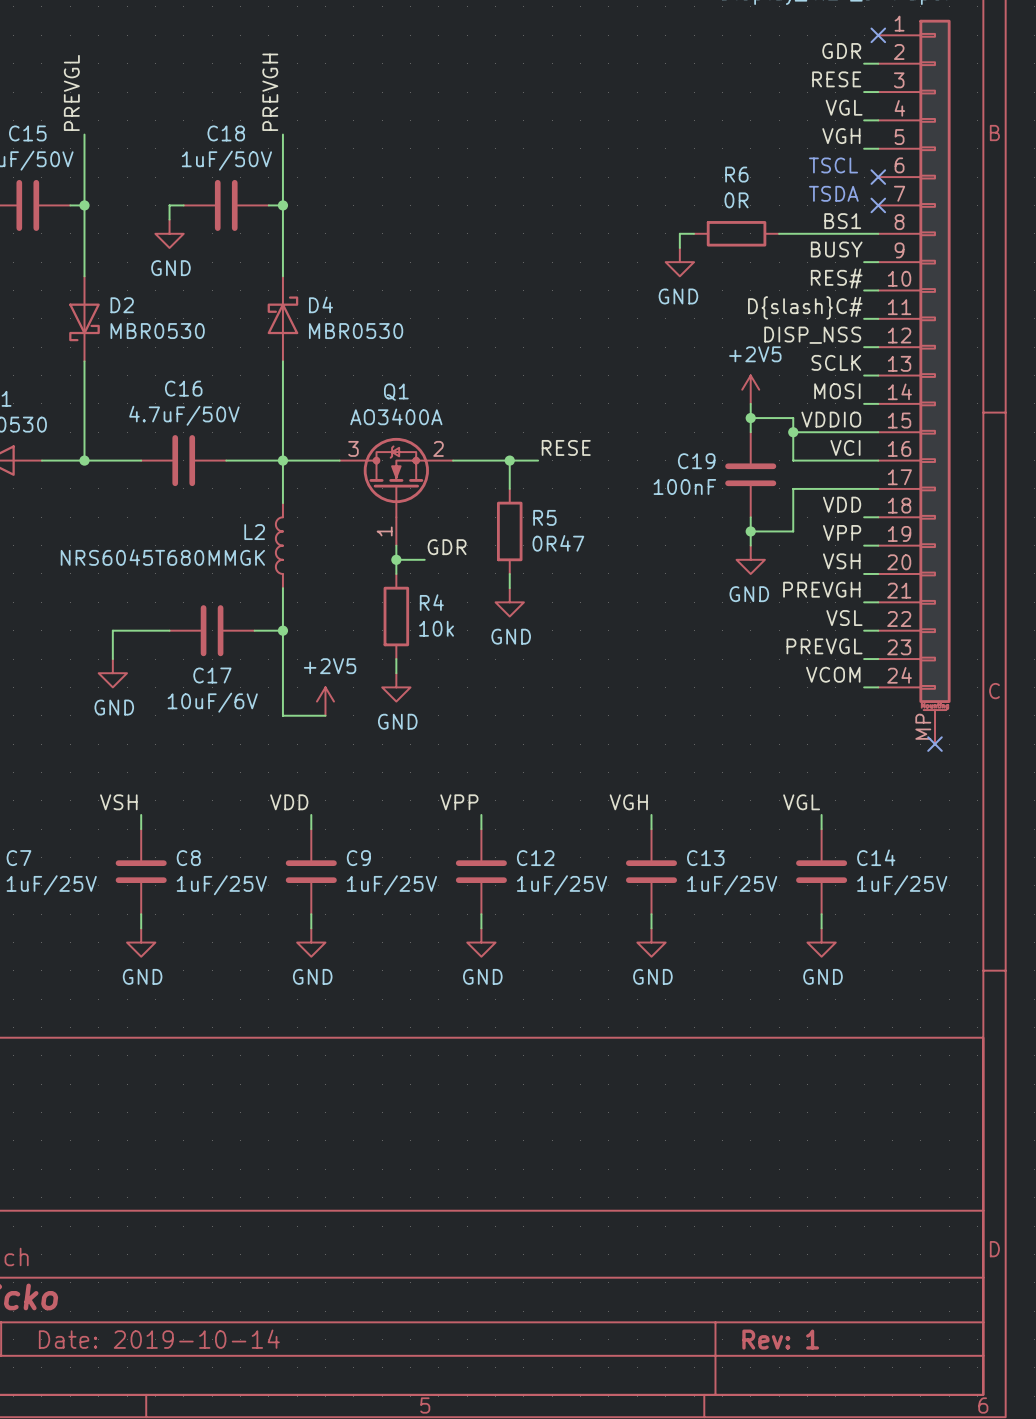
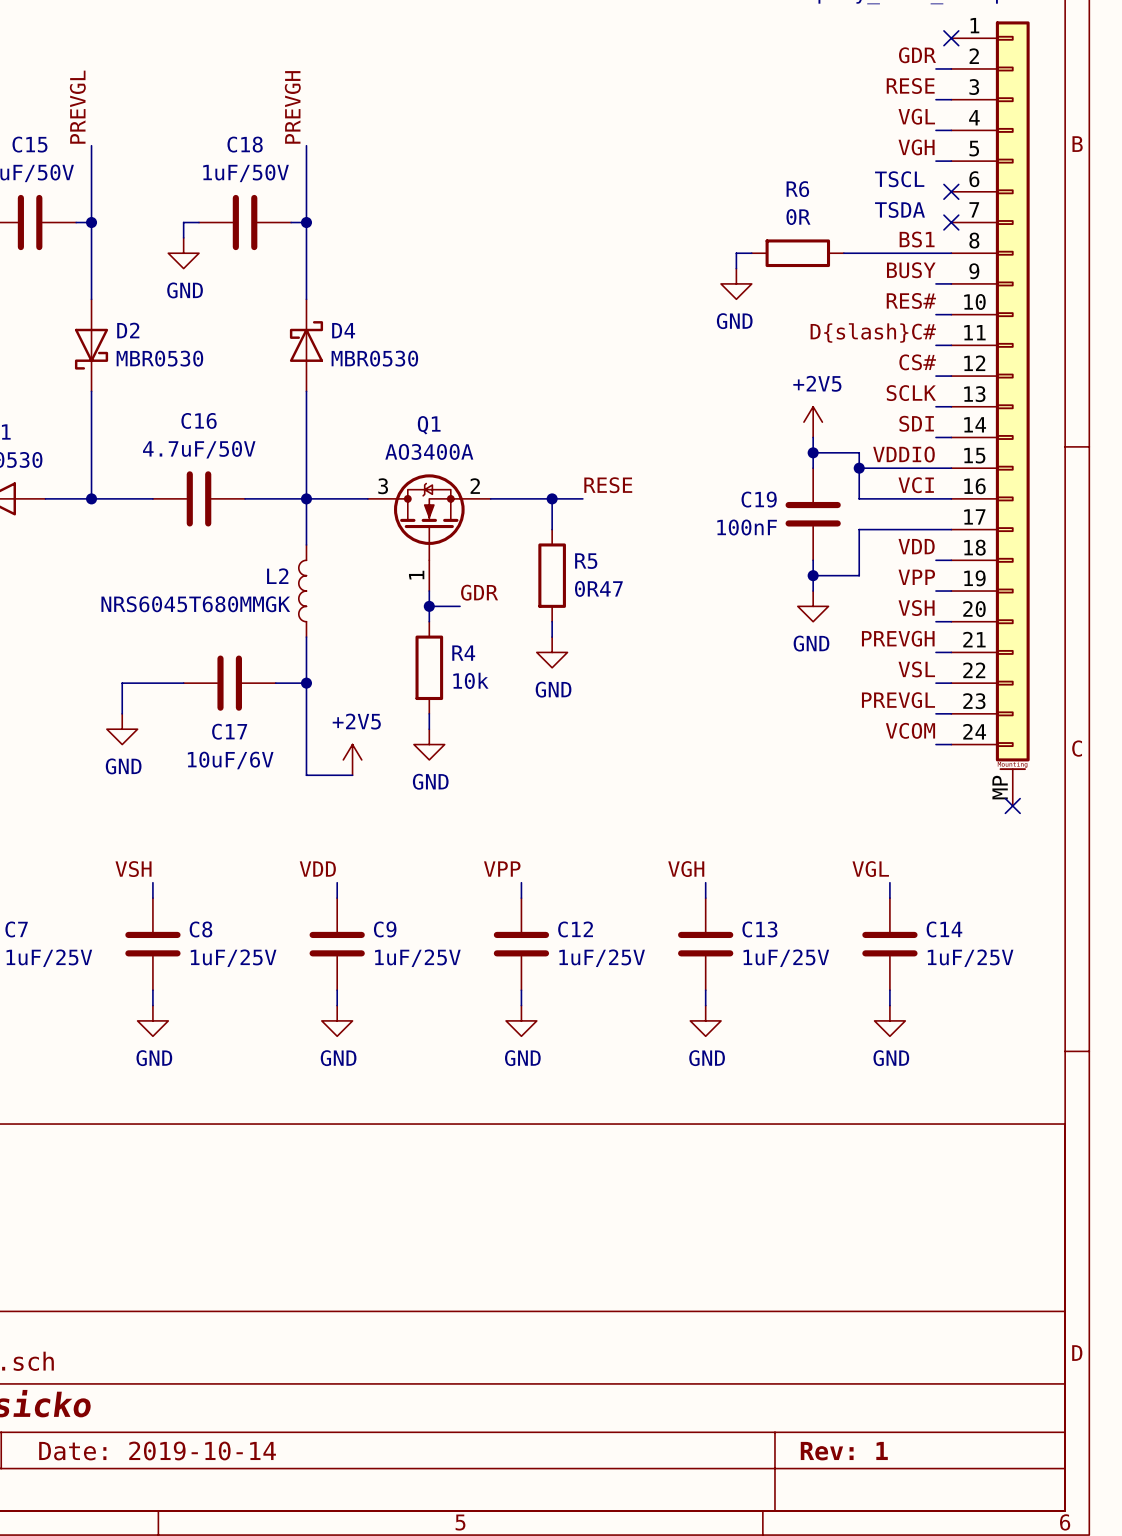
label: DISP_NSS (812, 335) -> CS# (917, 362)
label: MOSI (837, 391) -> SDI (916, 423)

